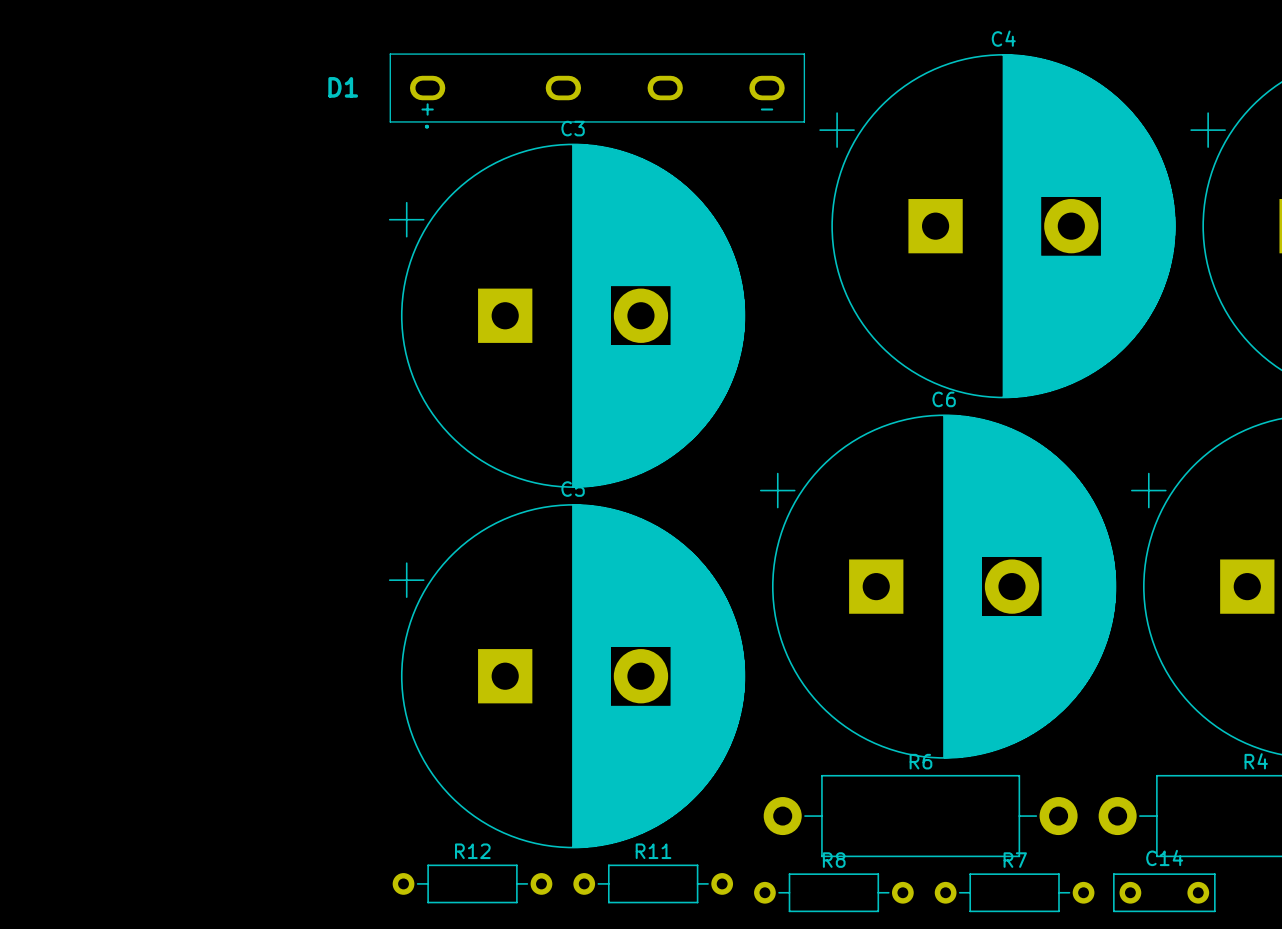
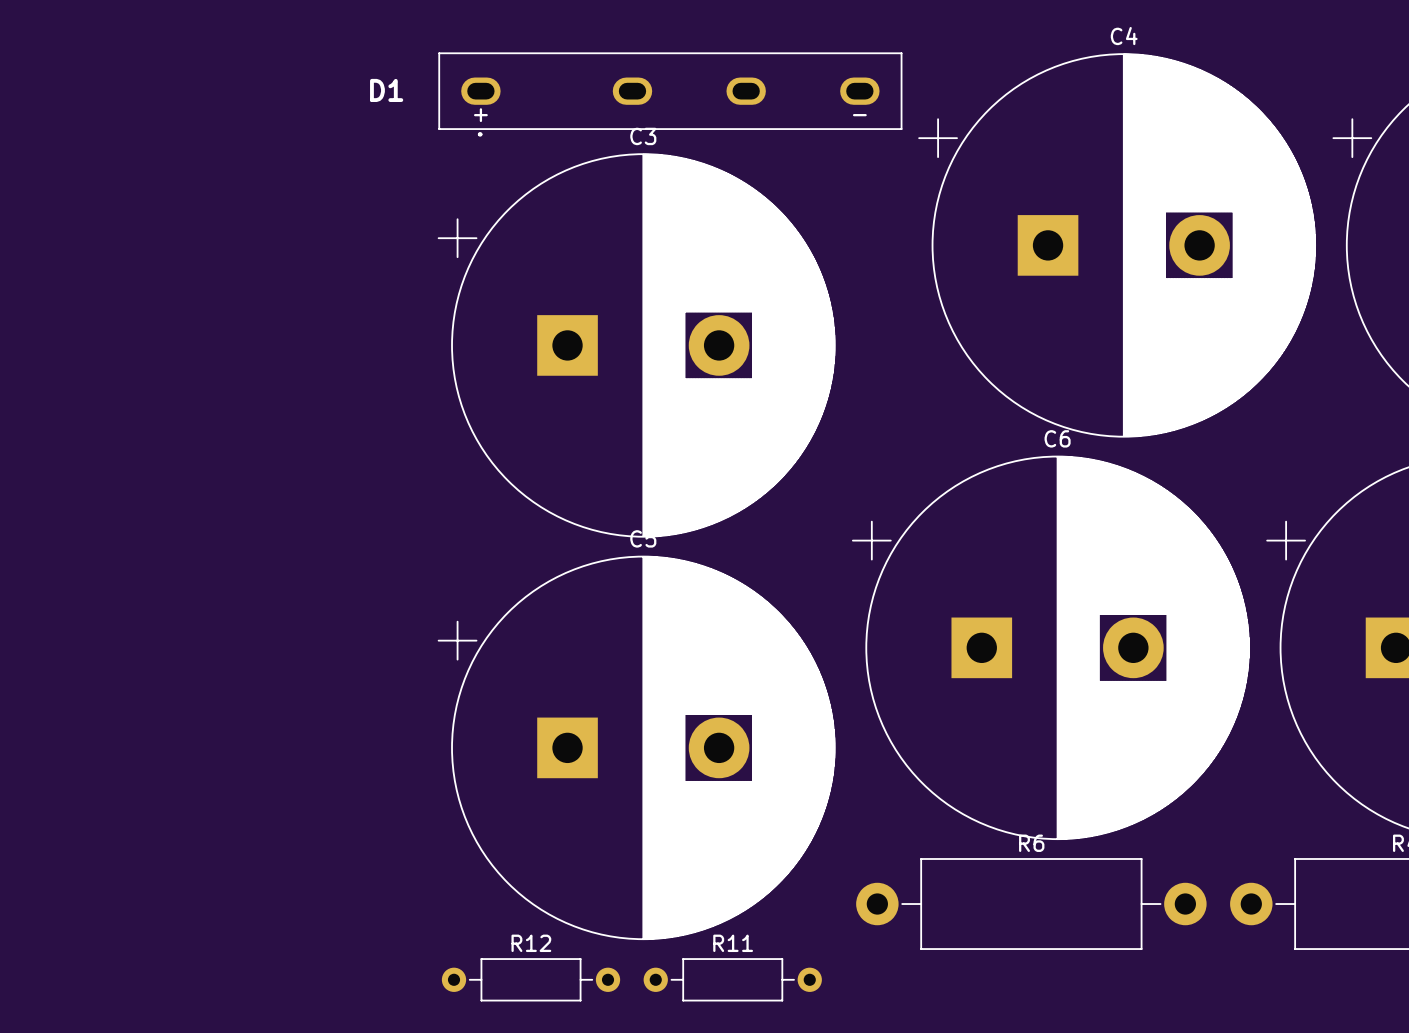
R8: (833, 892) -> none
R7: (1014, 892) -> none
C14: (1164, 892) -> none

